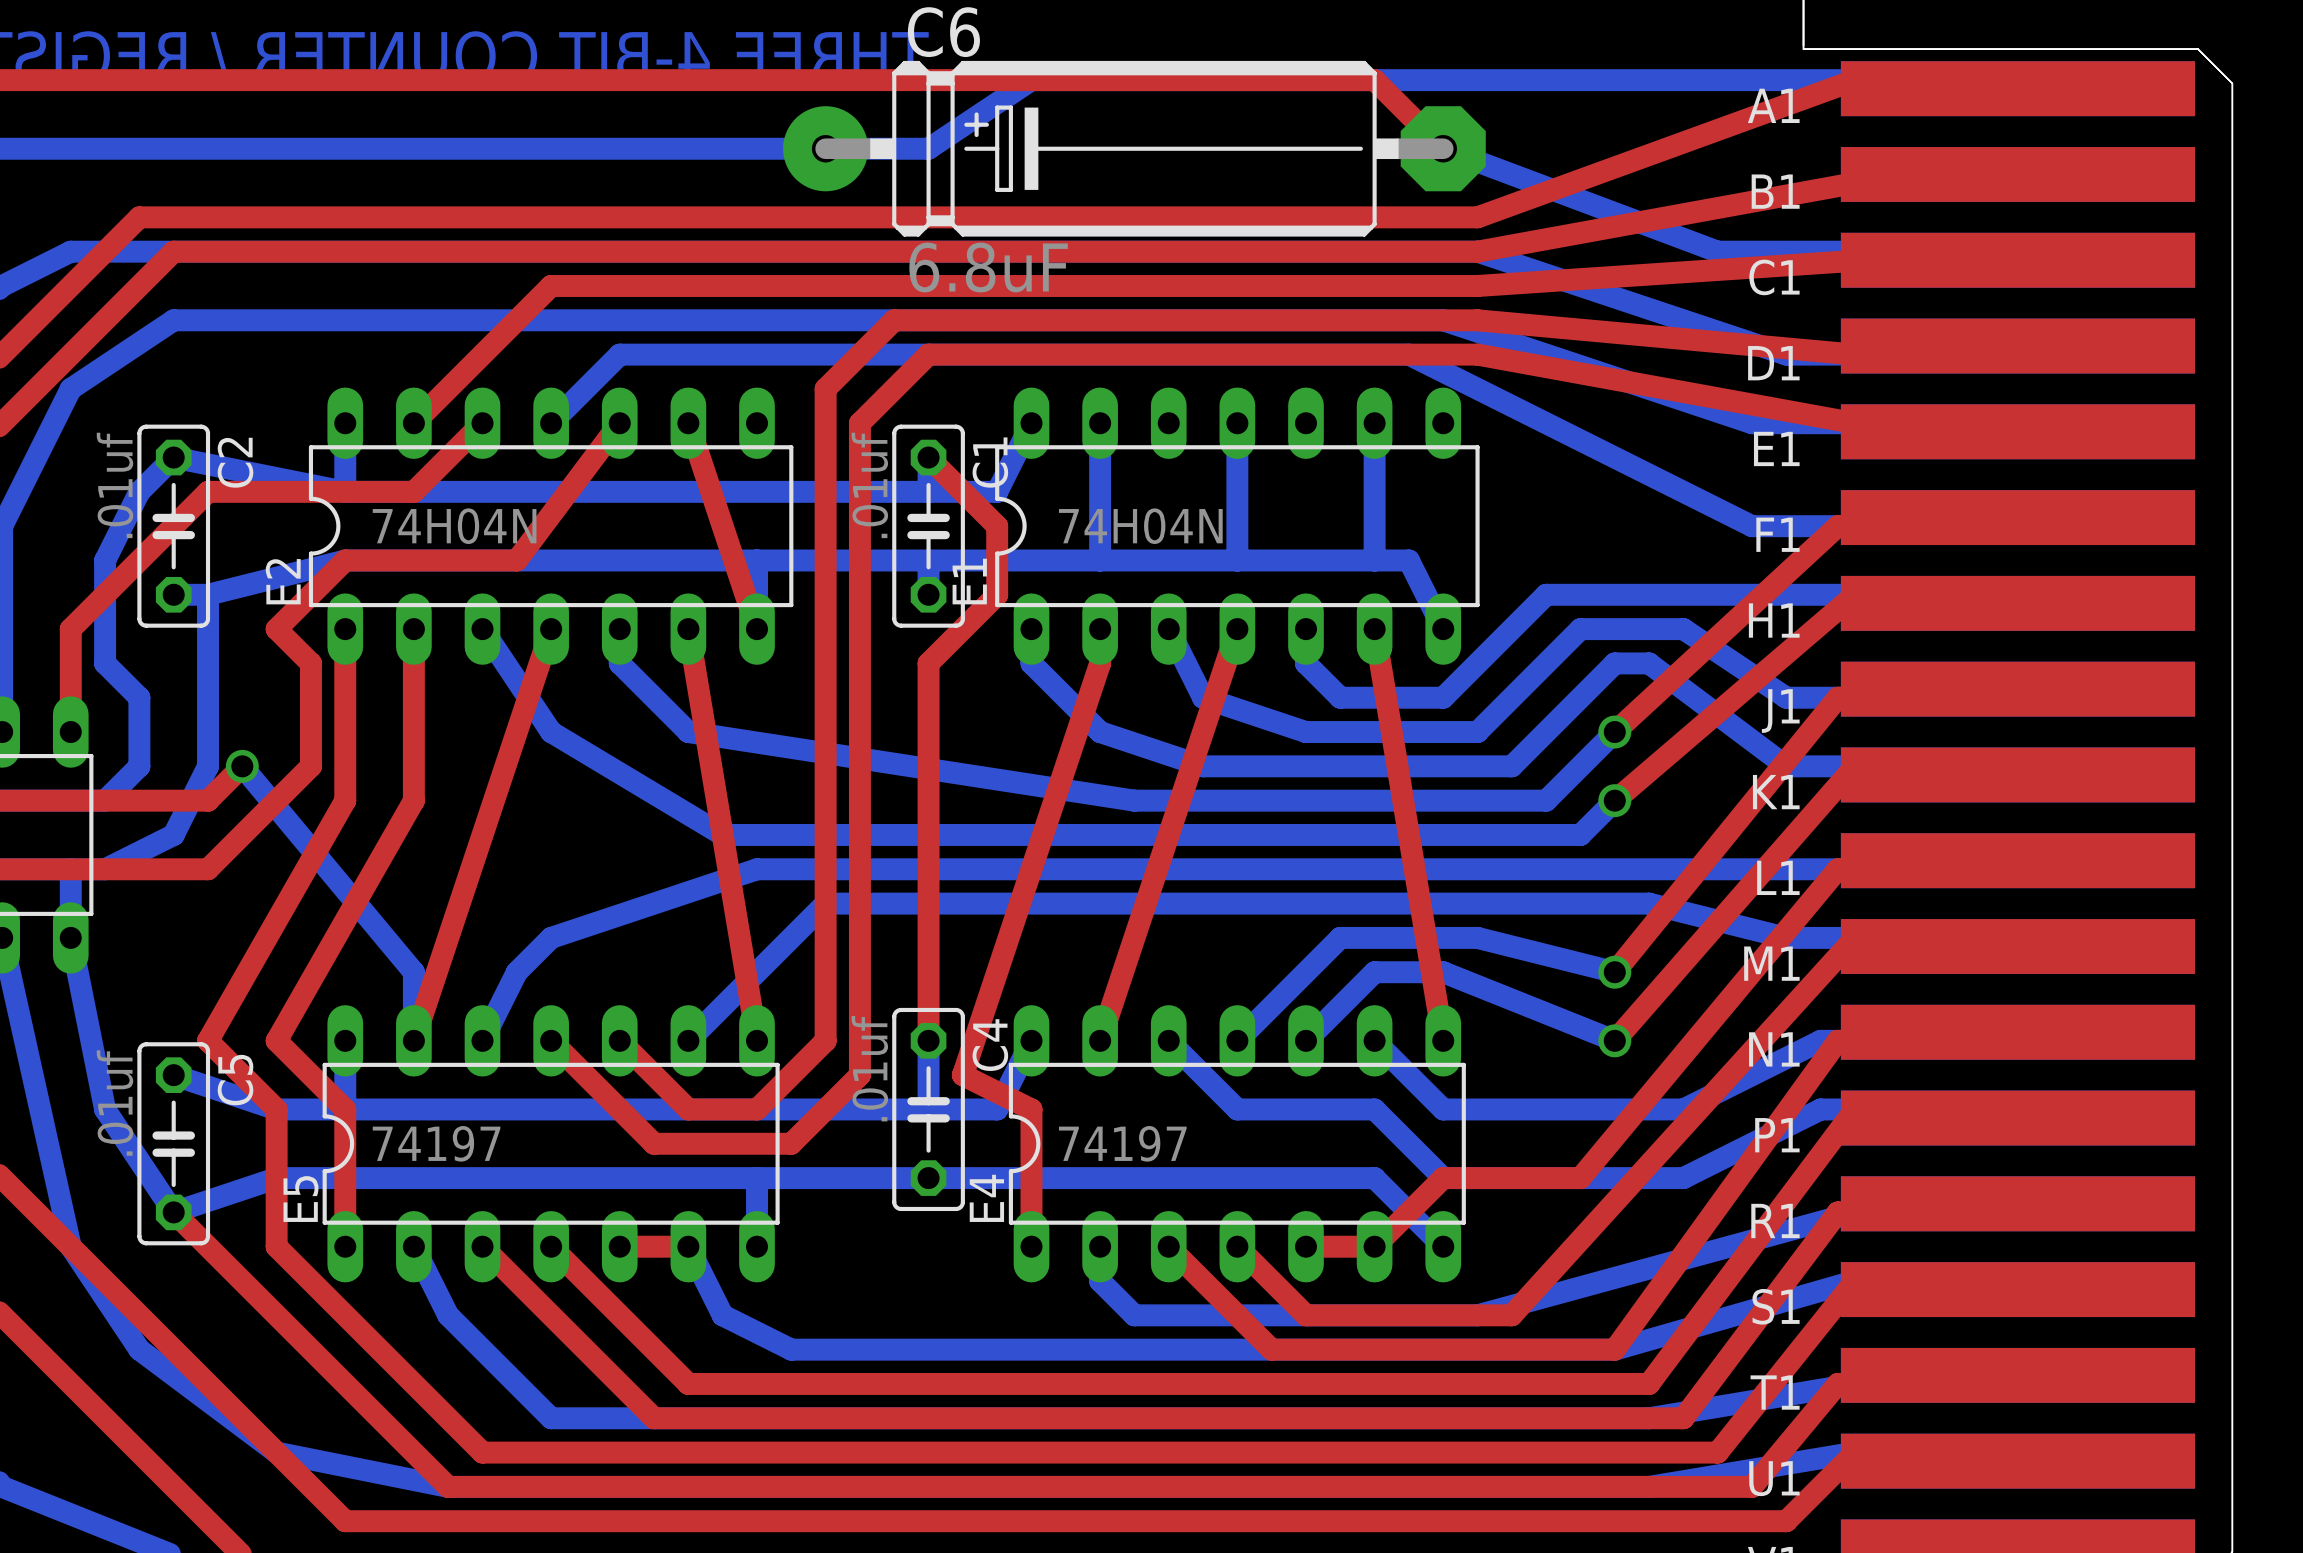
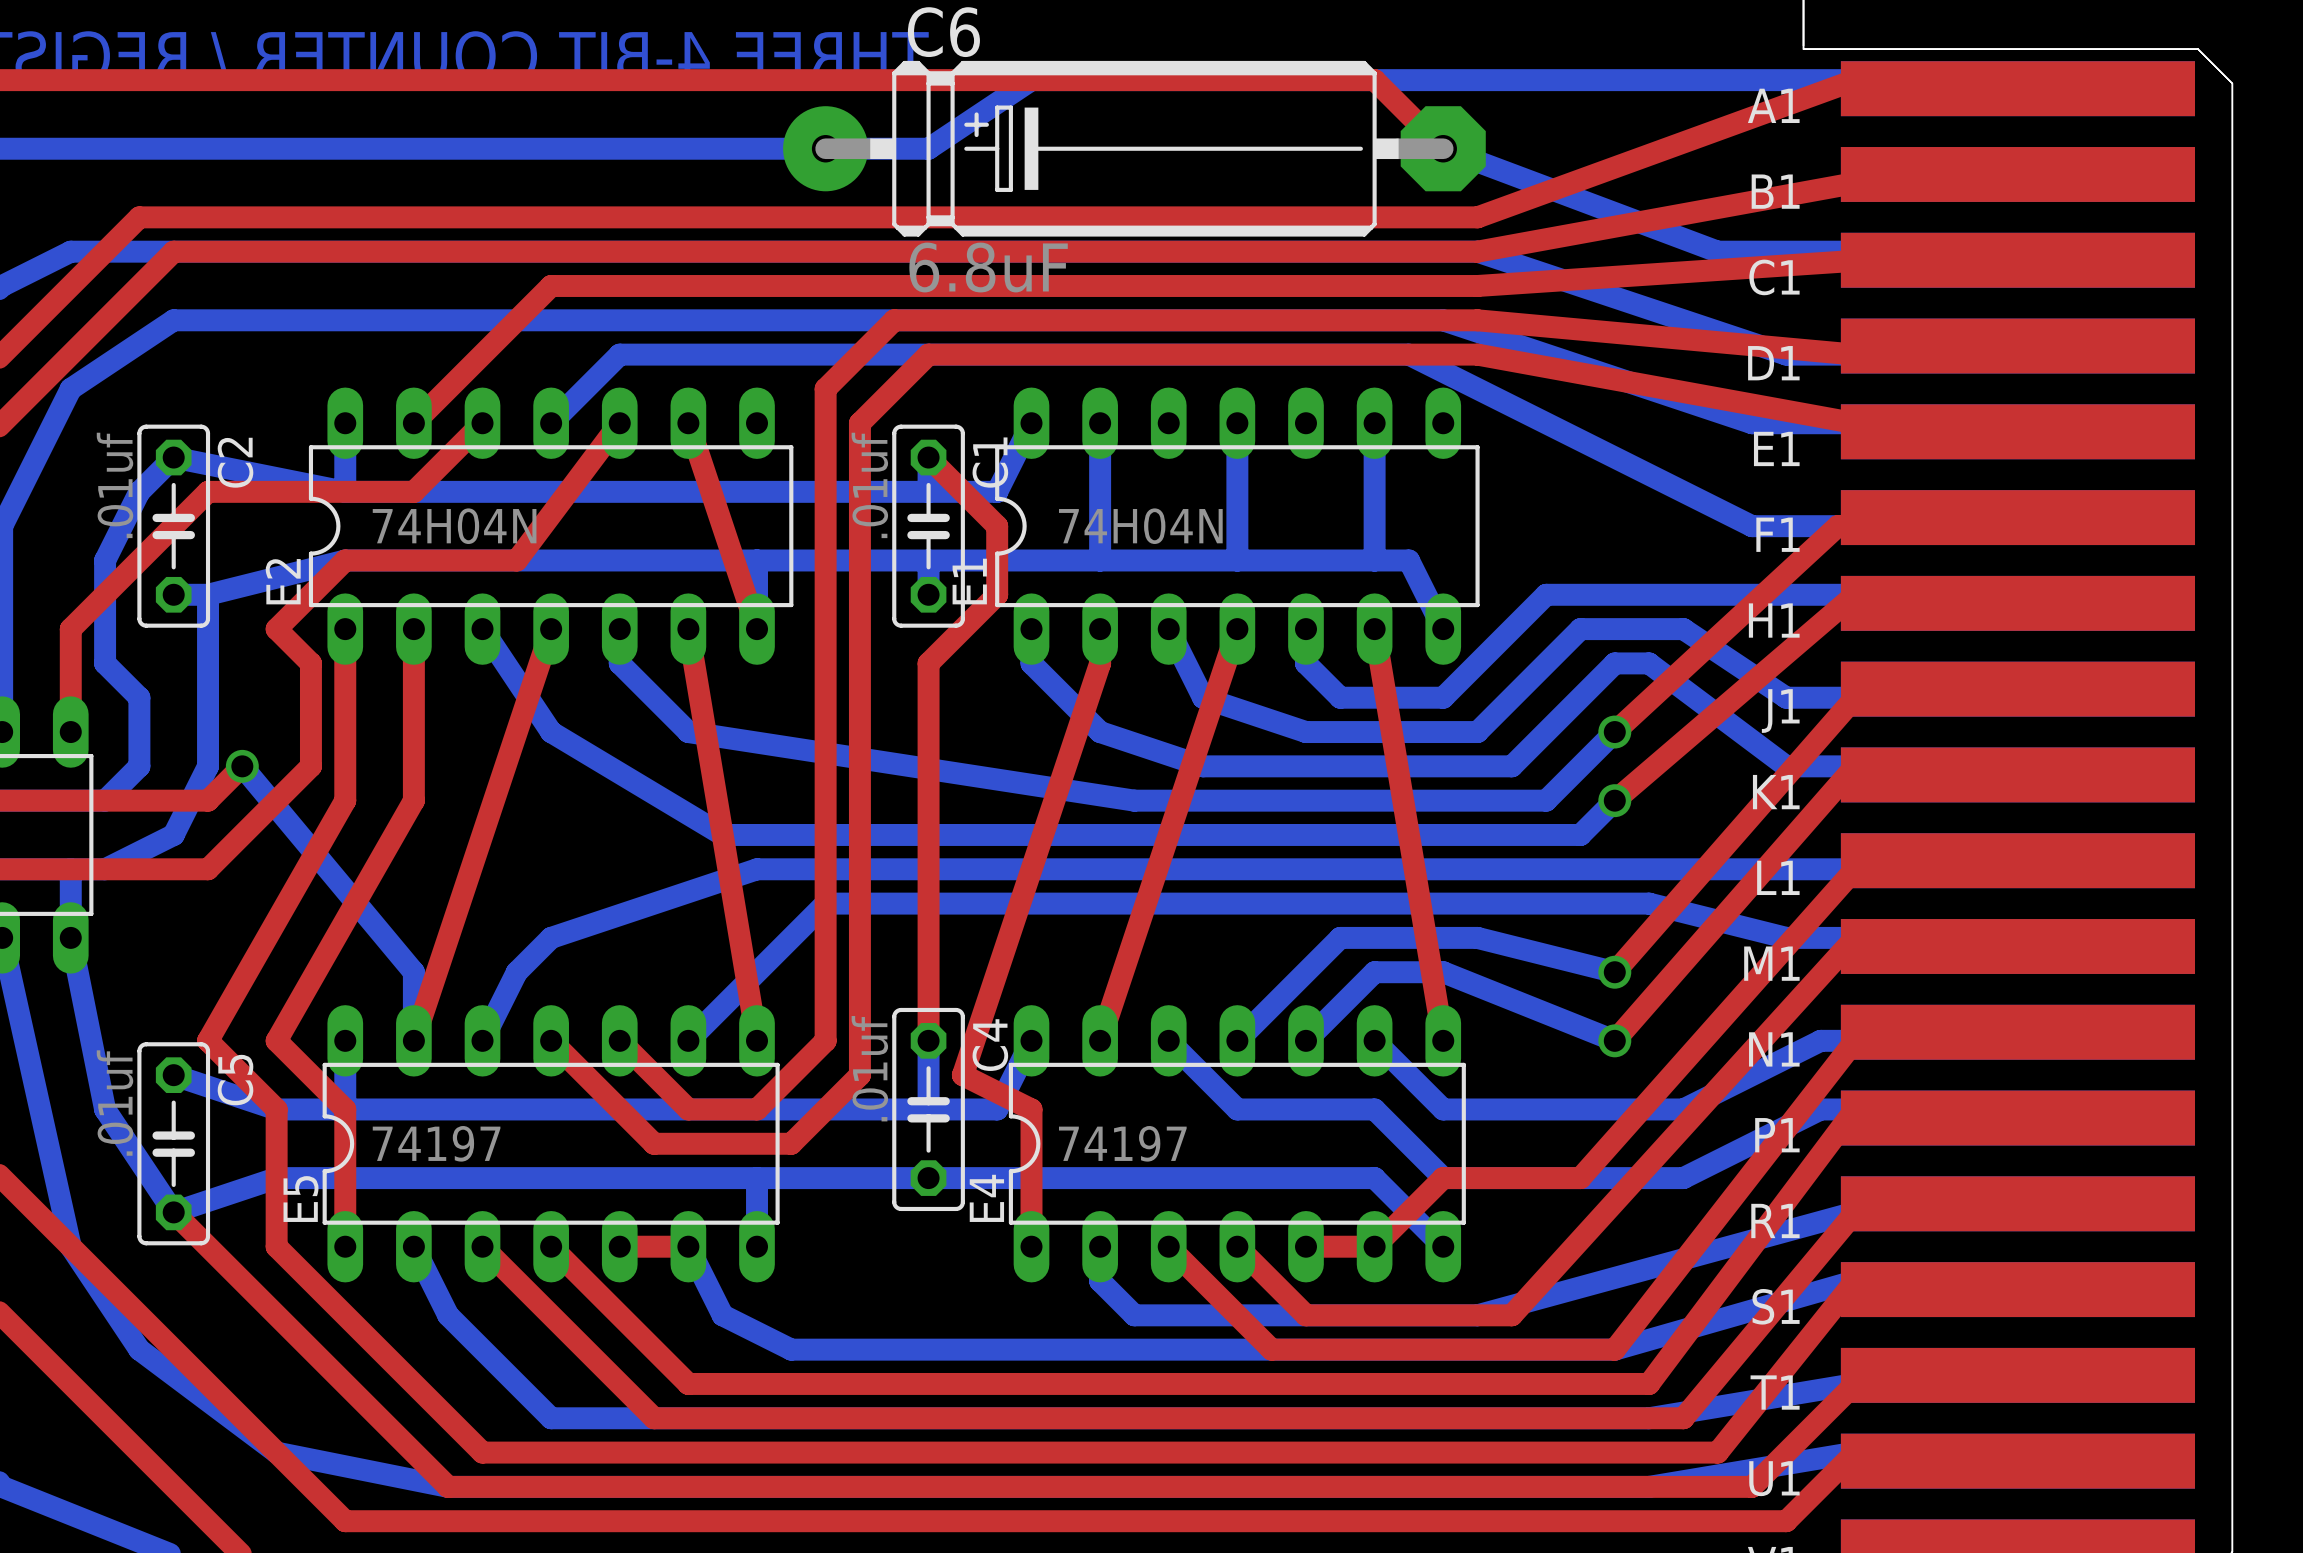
top track: (1854, 697) (1837, 697) (1614, 972) -> (1854, 697) (1614, 972)
top track: (1854, 869) (1837, 869) (1580, 1178) -> (1854, 869) (1580, 1178)
top track: (1854, 1040) (1837, 1040) (1614, 1349) -> (1854, 1040) (1614, 1349)
top track: (1854, 1212) (1837, 1212) (1683, 1418) -> (1854, 1212) (1683, 1418)
top track: (1854, 1383) (1837, 1383) (1752, 1486) -> (1854, 1383) (1752, 1486)

